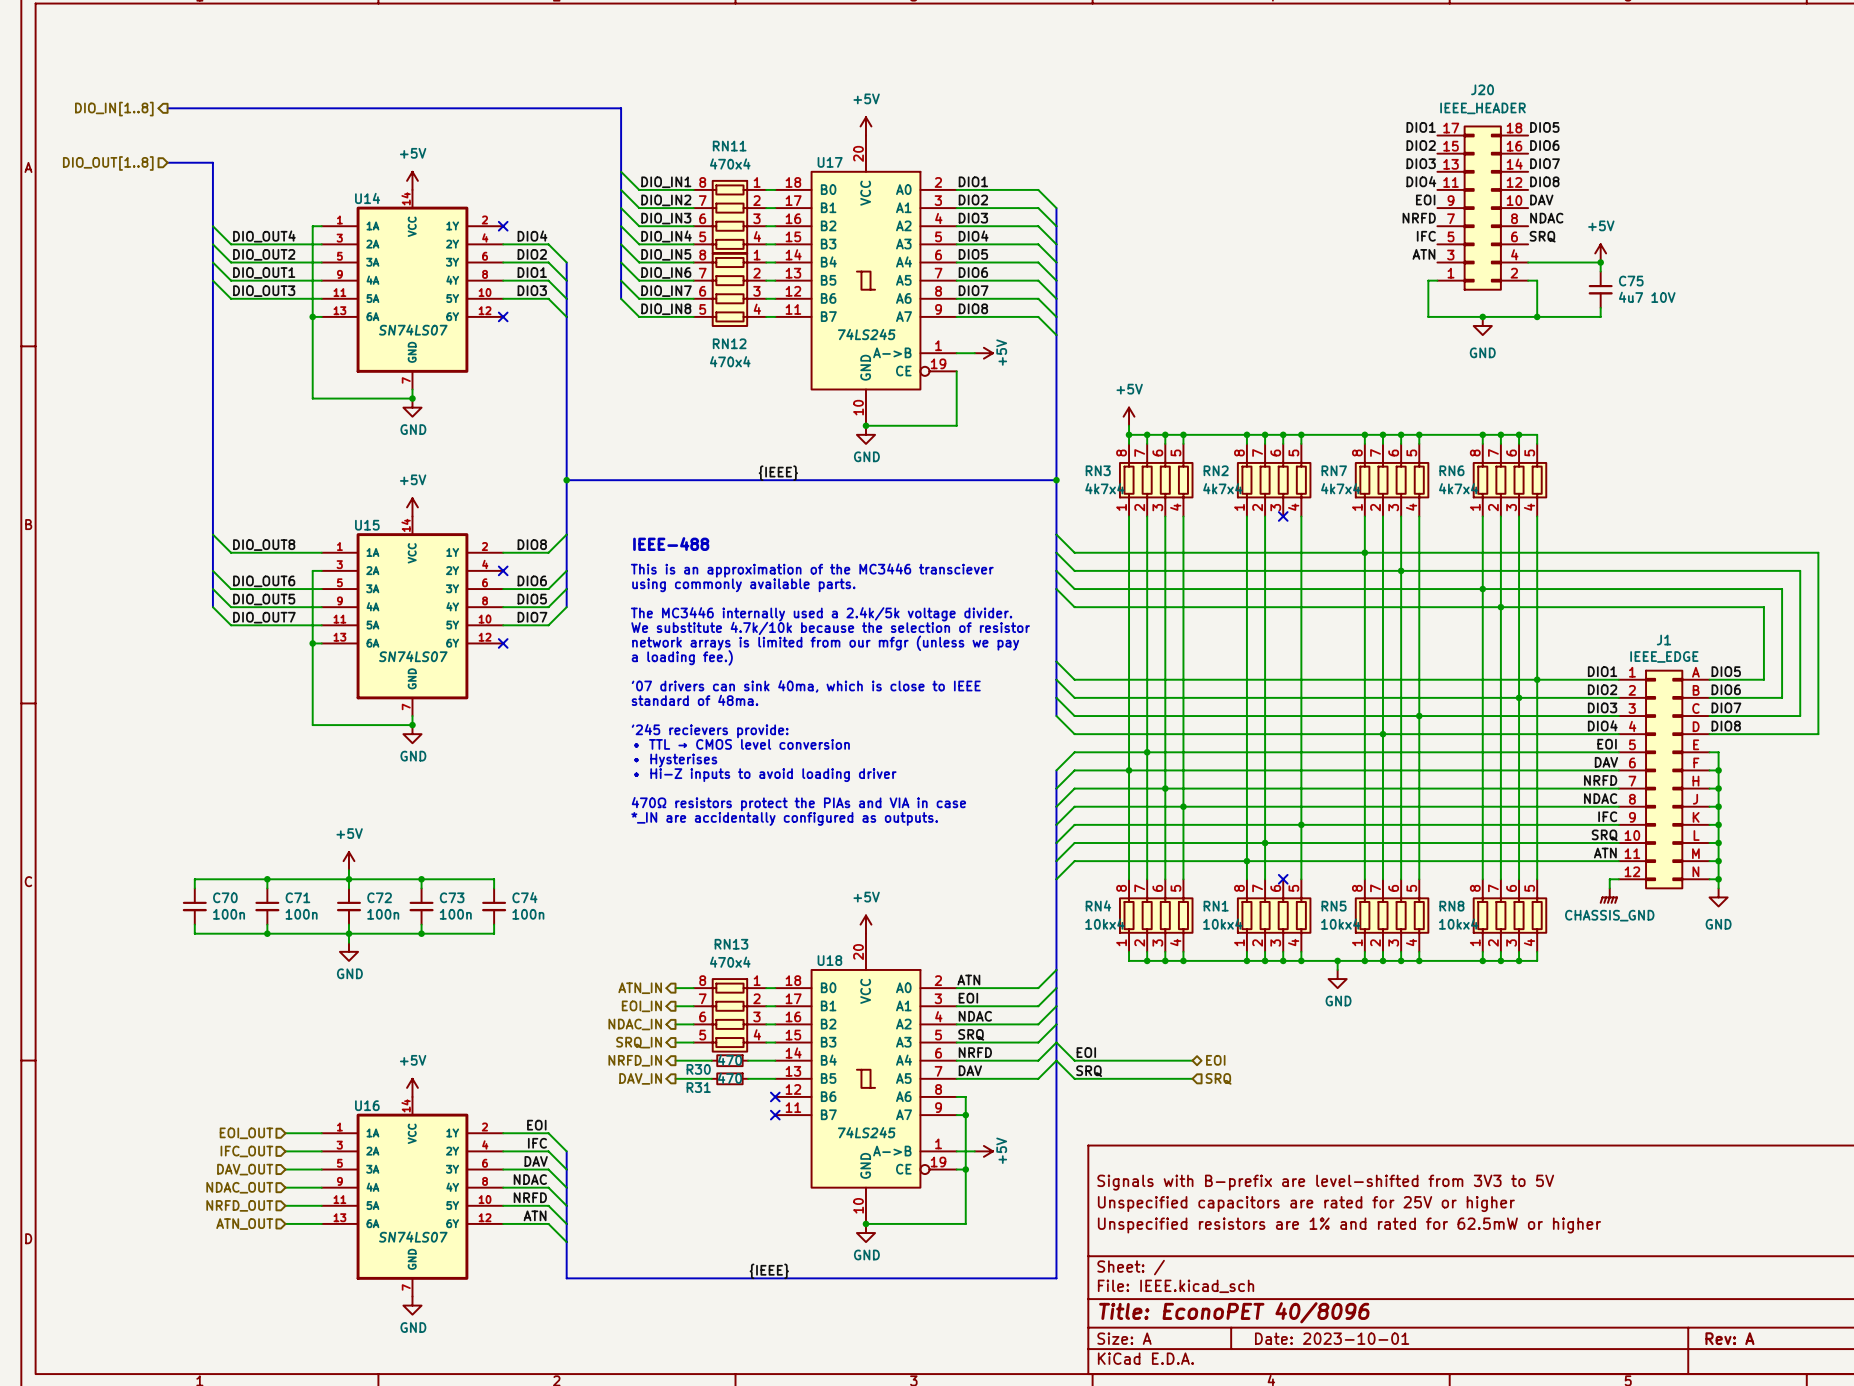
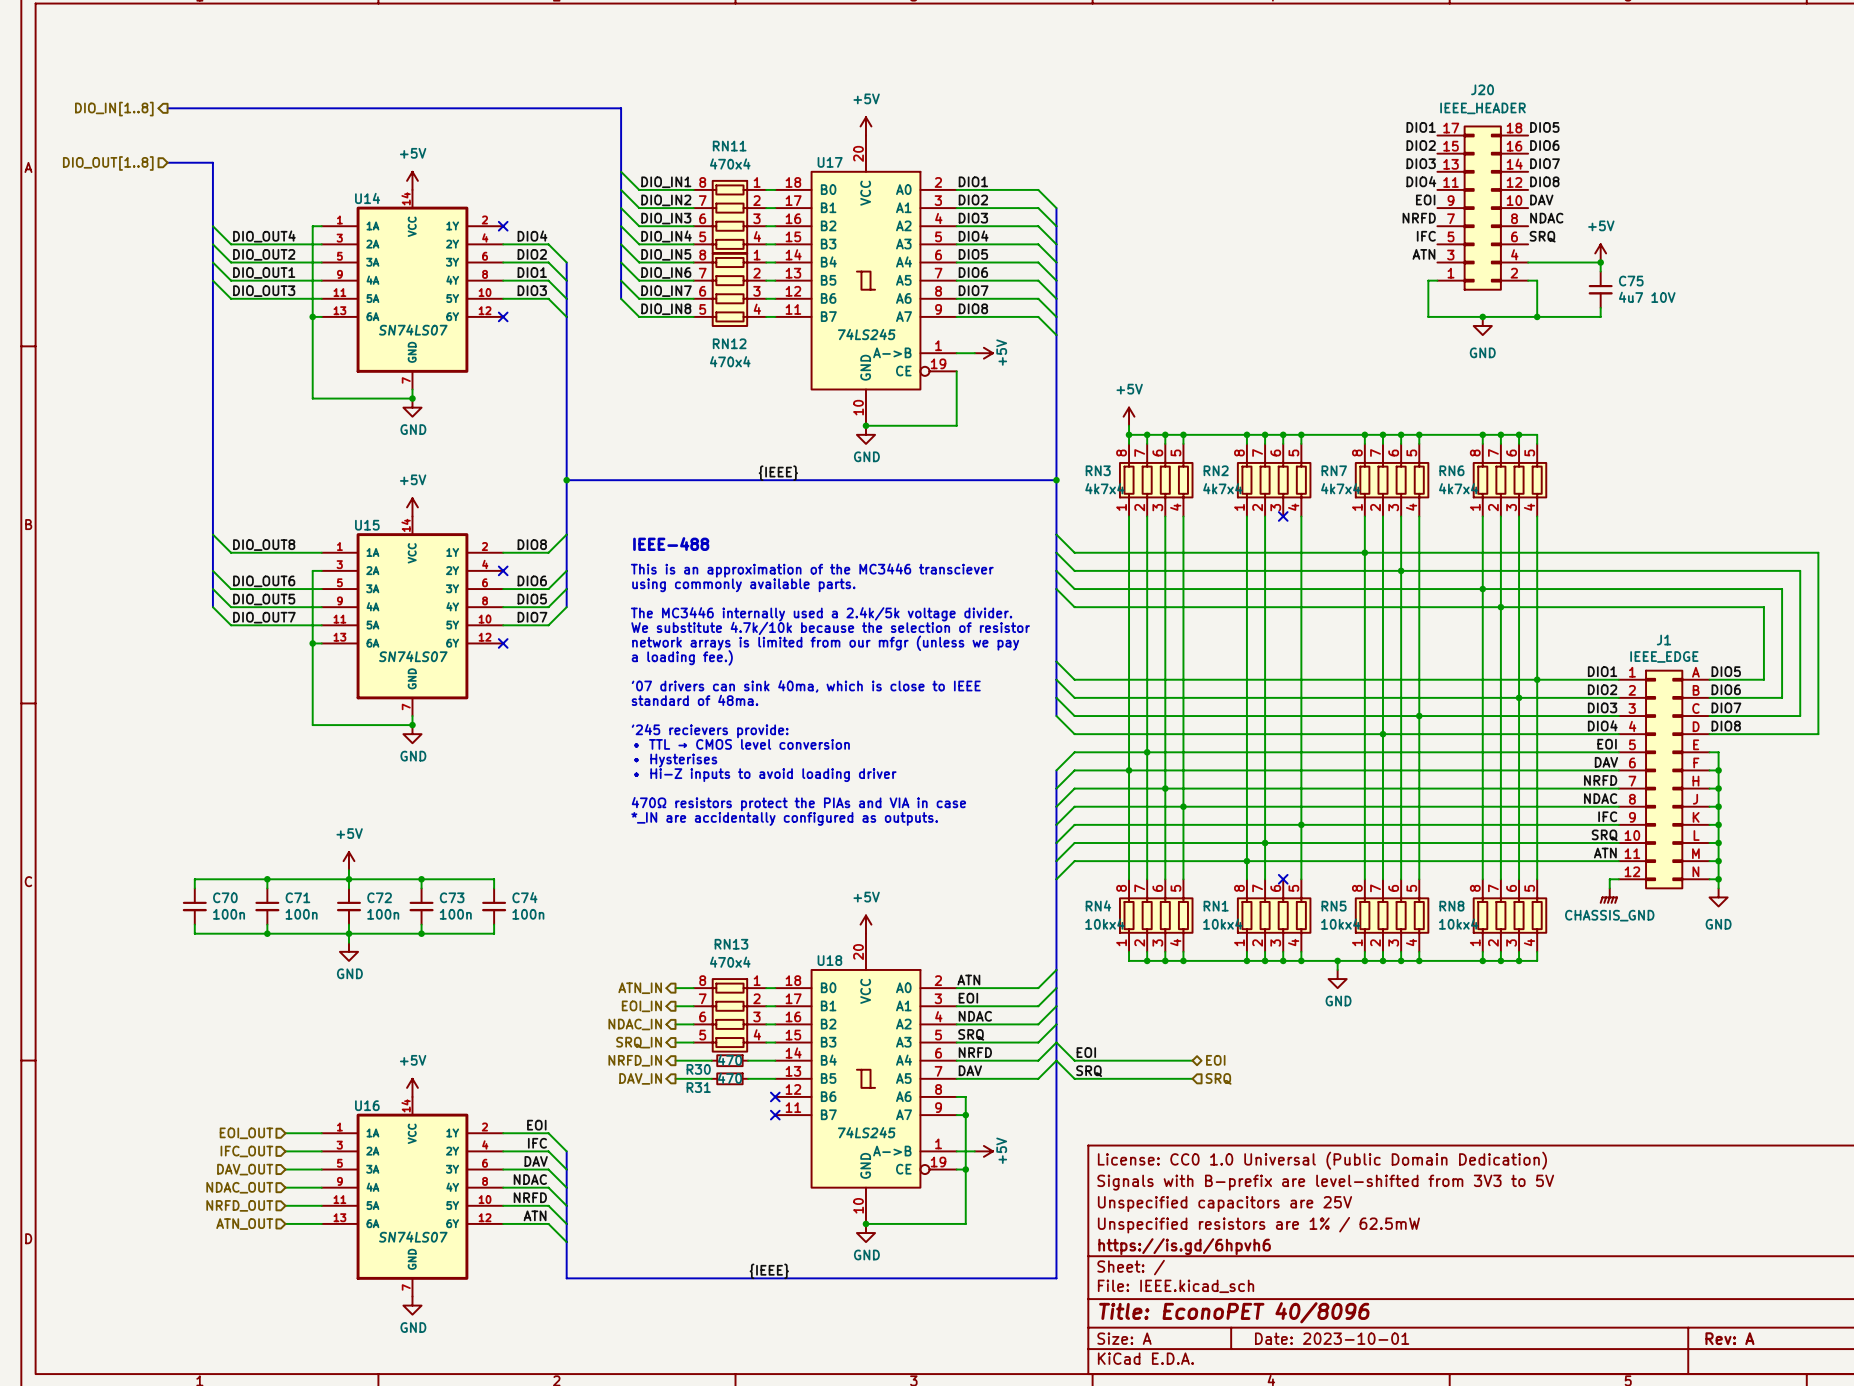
title block: none -> License: CC0 1.0 Universal (Public Domain Dedication) (1322, 1160)
title block: Unspecified capacitors are rated for 25V or higher (1306, 1204) -> Unspecified capacitors are 25V (1224, 1204)
title block: Unspecified resistors are 1% and rated for 62.5mW or higher (1349, 1225) -> Unspecified resistors are 1% / 62.5mW (1258, 1225)
title block: none -> https://is.gd/6hpvh6 (1184, 1246)

